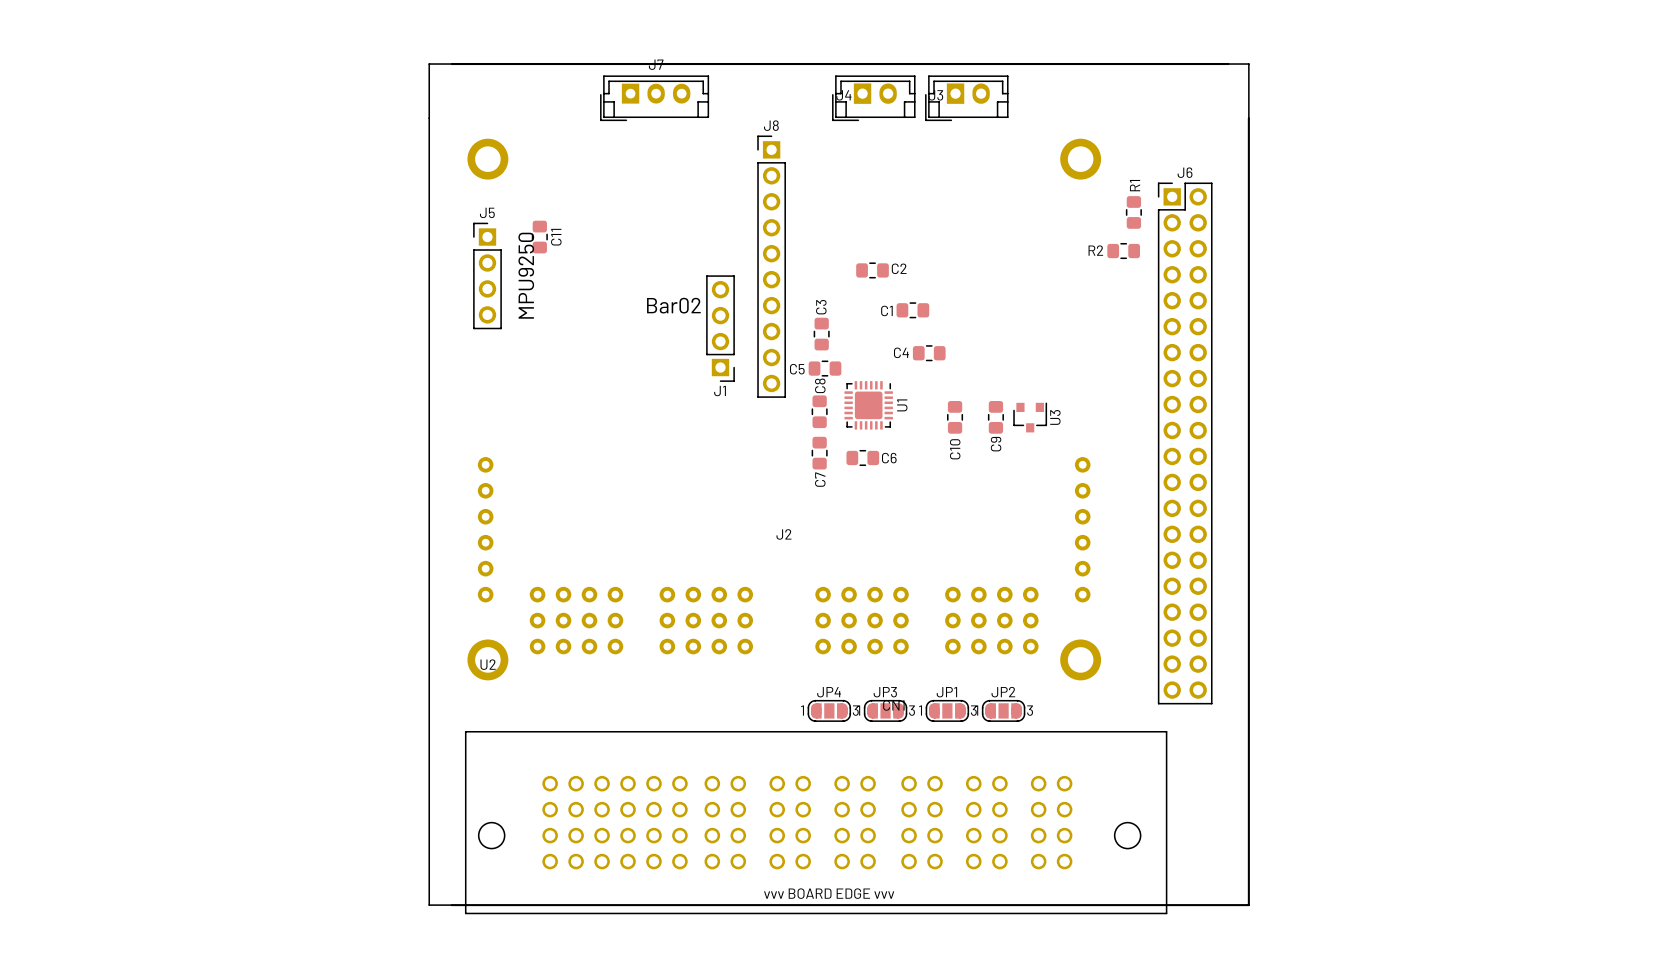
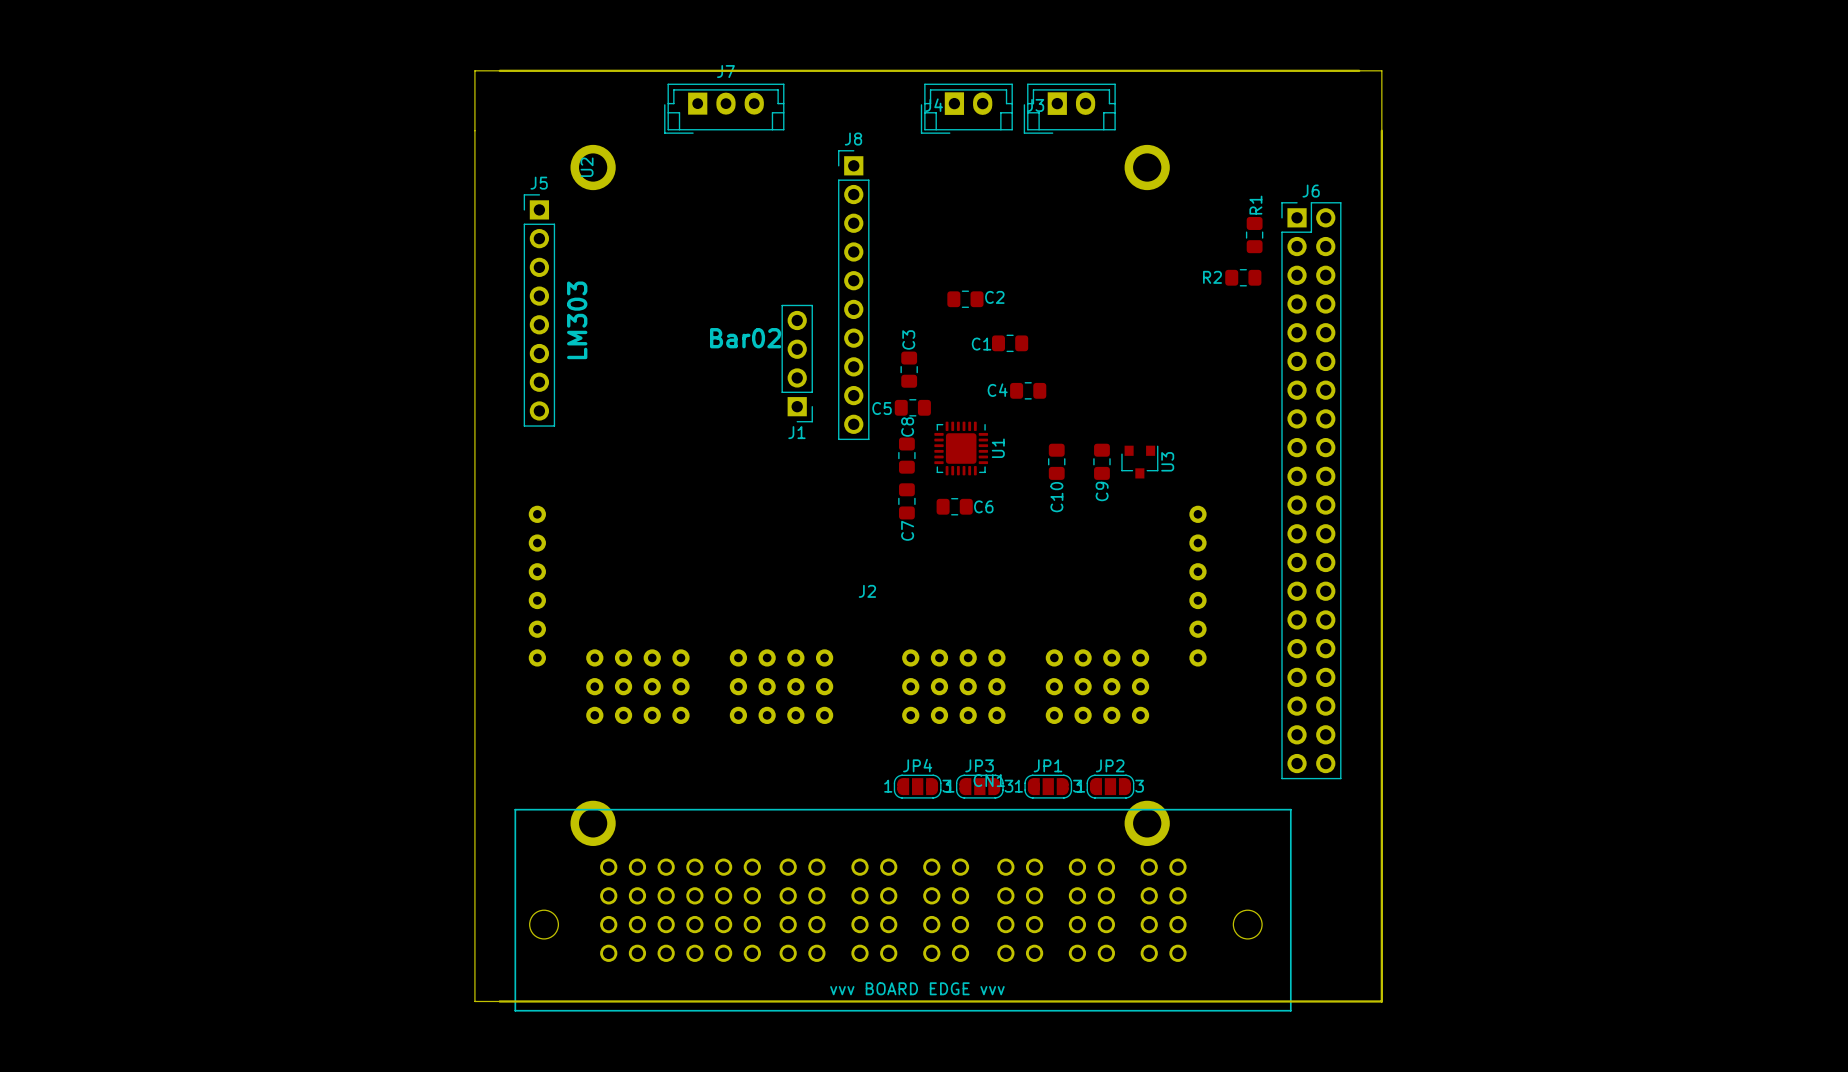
J5 name position: J5 (487, 212) -> J5 (539, 183)
J5 footprint: [473, 222, 502, 330] -> [523, 194, 556, 427]
C11: (539, 237) -> none
text: MPU9250 (526, 275) -> none
text: none -> LM303 (577, 320)
U2 rotation: 0° (784, 409) -> 90° clockwise (870, 495)

